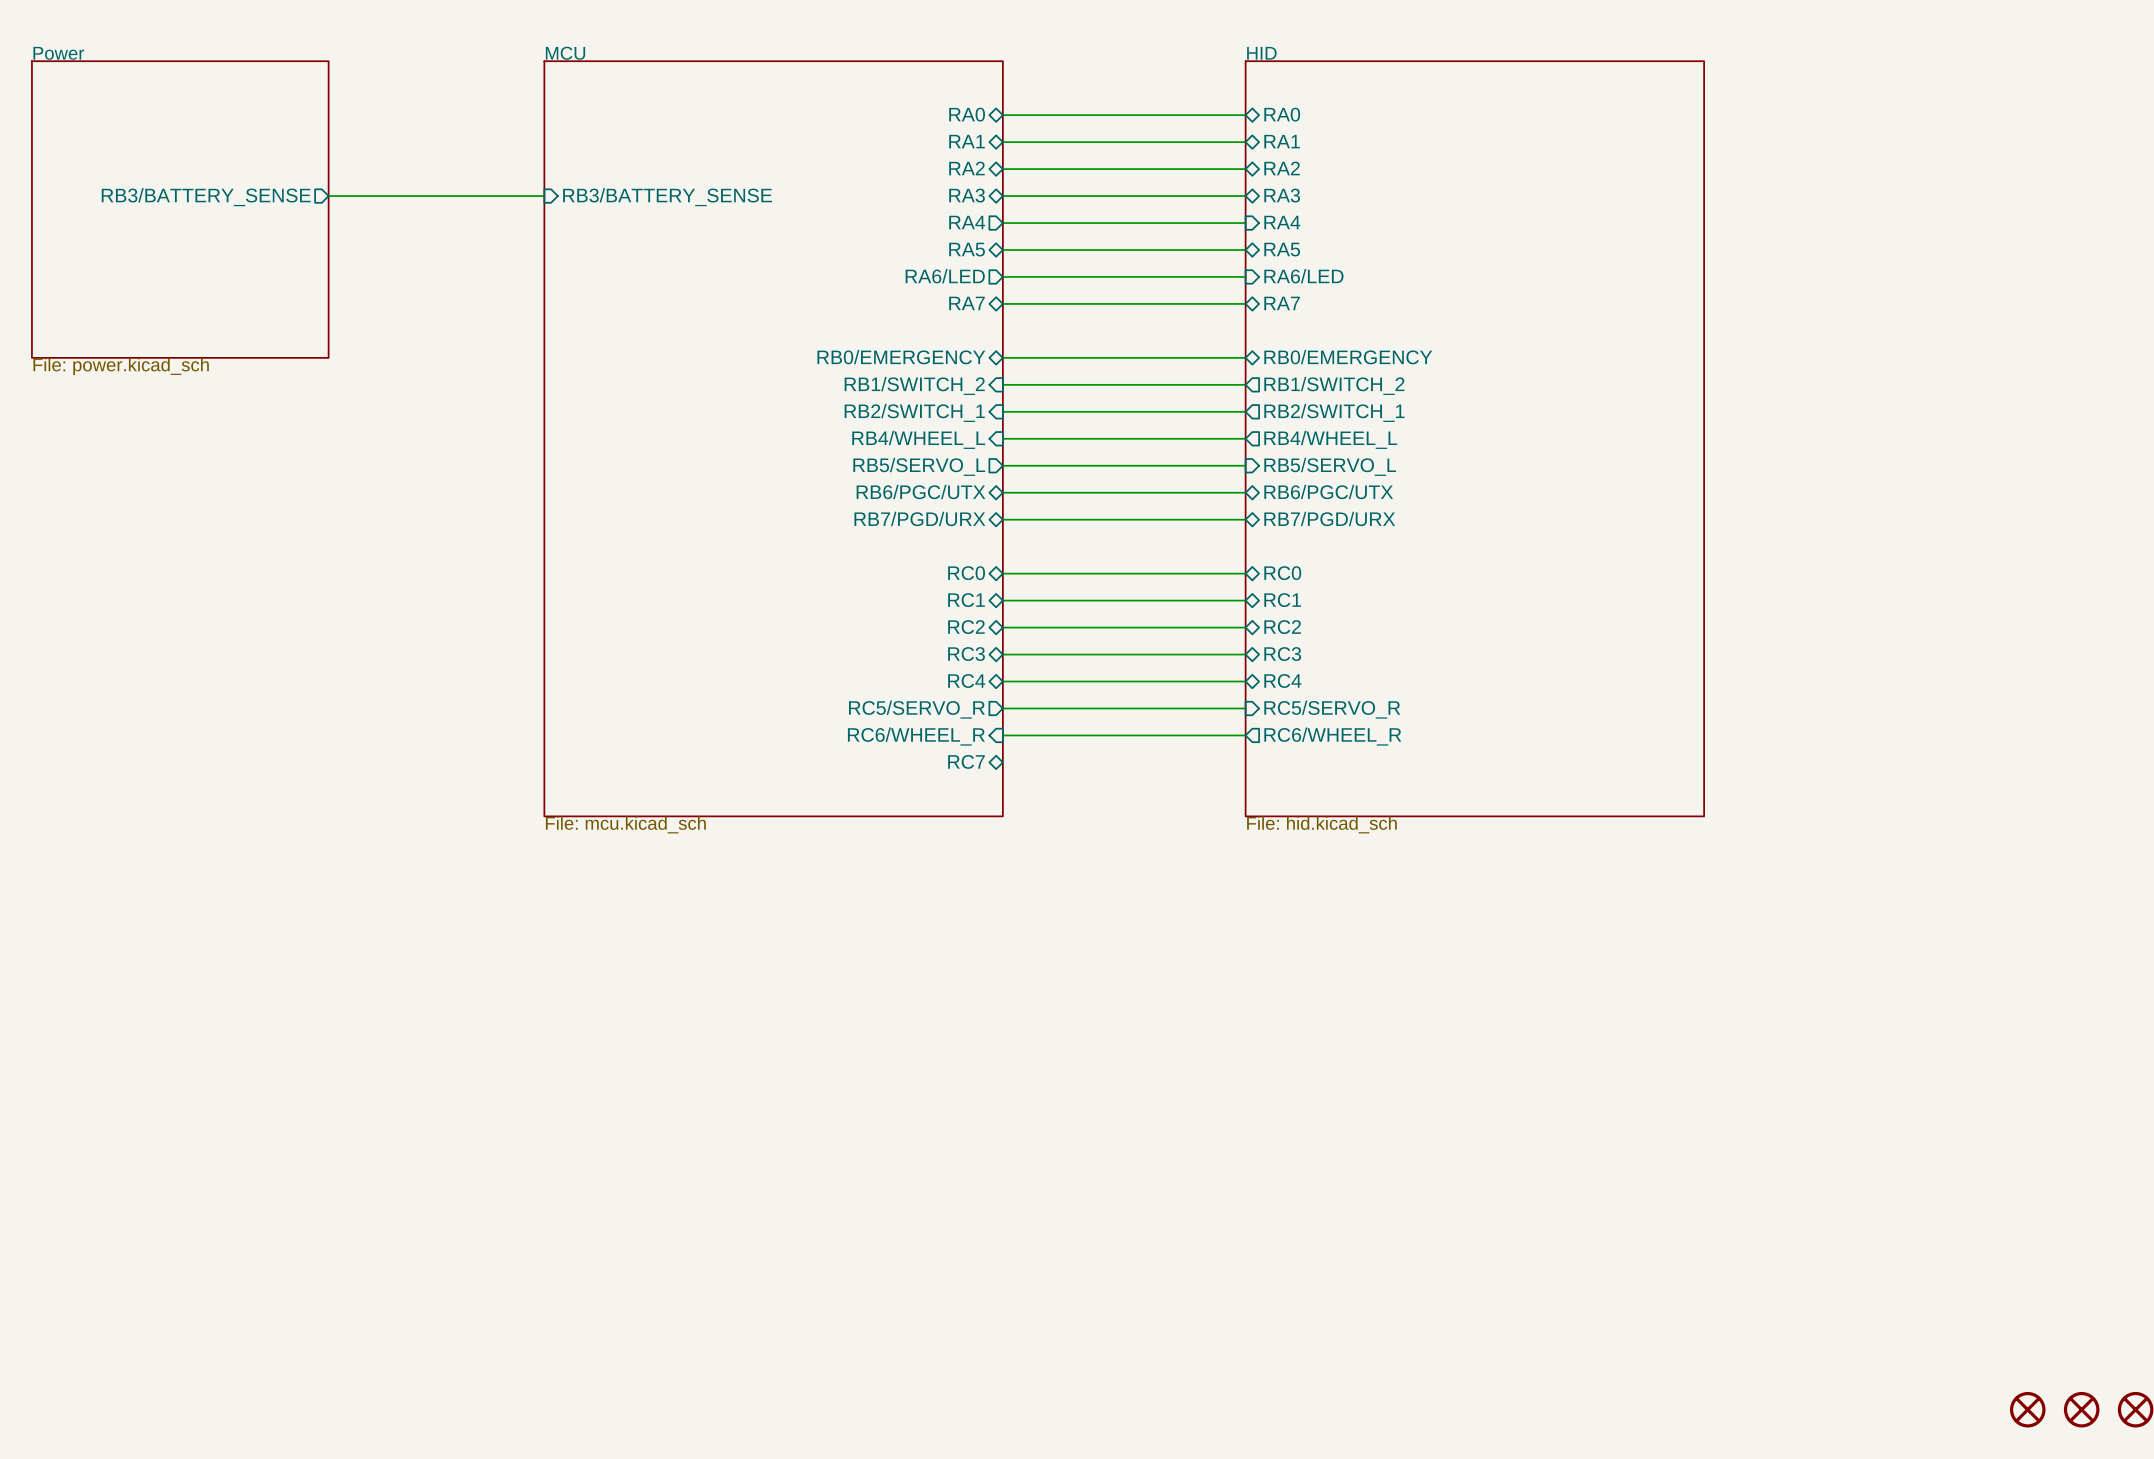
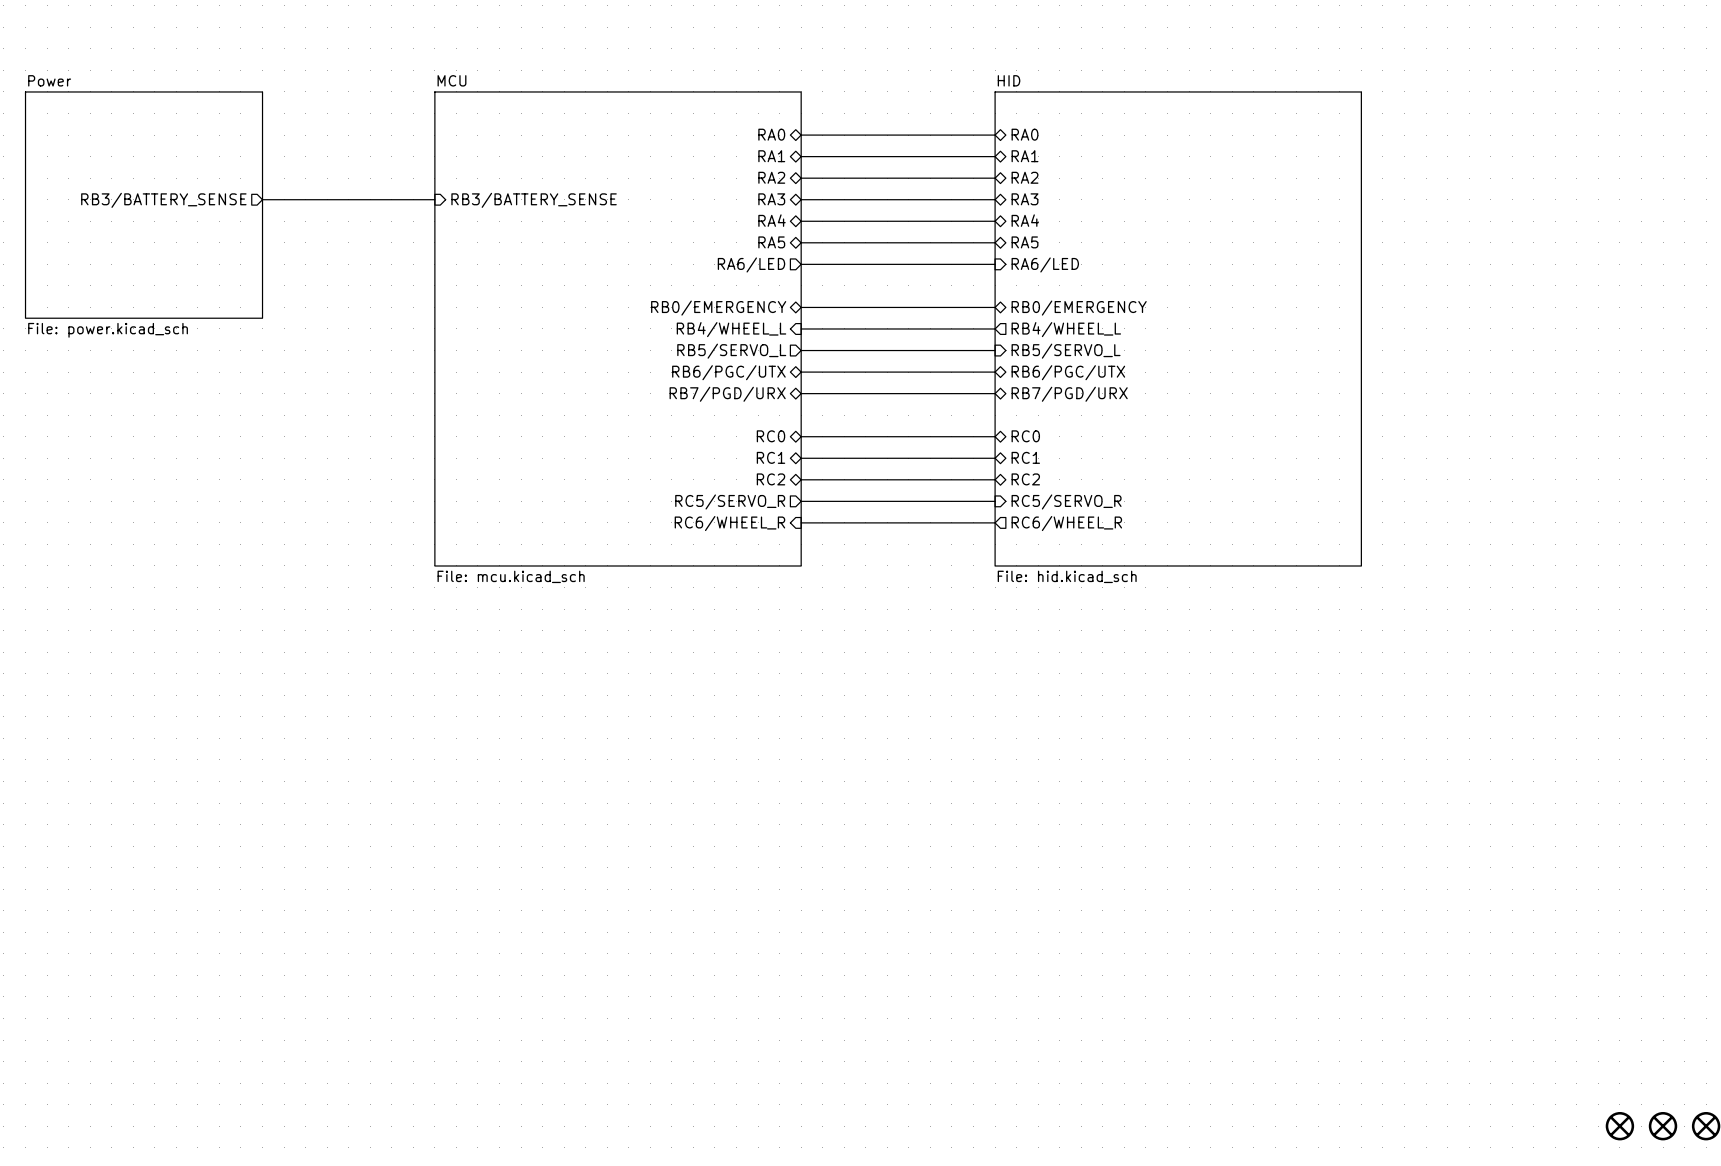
sheet pin: RA0 (967, 114) -> none
sheet pin: RA0 (1282, 114) -> none
wire: (1002, 115) (1245, 115) -> none
sheet pin: RA1 (967, 141) -> none
sheet pin: RA1 (1282, 141) -> none
wire: (1002, 142) (1245, 142) -> (801, 264) (995, 264)
sheet pin: RA2 (966, 168) -> RA0 (771, 134)
sheet pin: RA2 (1282, 168) -> RA0 (1025, 134)
sheet pin: RA3 (967, 195) -> RA1 (771, 156)
sheet pin: RA3 (1282, 195) -> RA1 (1025, 156)
wire: (328, 196) (544, 196) -> (262, 199) (434, 199)
sheet pin position: RB3/BATTERY_SENSE (206, 197) -> RB3/BATTERY_SENSE (163, 200)
sheet pin position: RB3/BATTERY_SENSE (667, 197) -> RB3/BATTERY_SENSE (534, 200)
sheet Power: File: power.kicad_sch (180, 209) -> none
sheet pin shape: output (967, 222) -> bidirectional (771, 177)
sheet pin: RA4 (967, 222) -> RA2 (771, 177)
sheet pin shape: input (1282, 222) -> bidirectional (1025, 177)
sheet pin: RA4 (1282, 222) -> RA2 (1025, 177)
sheet pin: RA5 (967, 249) -> RA3 (771, 199)
sheet pin: RA5 (1282, 249) -> RA3 (1025, 199)
sheet Power: none -> File: power.kicad_sch (144, 205)
sheet pin shape: output (945, 276) -> bidirectional (772, 220)
sheet pin: RA6/LED (945, 276) -> RA4 (772, 220)
sheet pin shape: input (1303, 276) -> bidirectional (1025, 220)
sheet pin: RA6/LED (1303, 276) -> RA4 (1025, 220)
sheet pin: RA7 (966, 303) -> RA5 (771, 242)
sheet pin: RA7 (1282, 303) -> RA5 (1025, 242)
sheet pin: none -> RA6/LED (751, 264)
sheet pin: none -> RA6/LED (1045, 264)
sheet pin: RB0/EMERGENCY (901, 357) -> none
wire: (1002, 357) (1245, 357) -> (801, 436) (995, 436)
sheet pin: RB0/EMERGENCY (1348, 357) -> none
sheet pin shape: input (914, 385) -> bidirectional (718, 308)
sheet pin: RB1/SWITCH_2 (914, 385) -> RB0/EMERGENCY (718, 308)
sheet pin shape: output (1334, 385) -> bidirectional (1079, 308)
sheet pin: RB1/SWITCH_2 (1334, 385) -> RB0/EMERGENCY (1079, 308)
sheet MCU: none -> File: mcu.kicad_sch (618, 328)
sheet HID: none -> File: hid.kicad_sch (1178, 328)
sheet pin: RB2/SWITCH_1 (914, 412) -> RB4/WHEEL_L (731, 329)
sheet pin: RB2/SWITCH_1 (1334, 412) -> RB4/WHEEL_L (1066, 329)
sheet MCU: File: mcu.kicad_sch (773, 438) -> none
sheet HID: File: hid.kicad_sch (1474, 438) -> none
sheet pin shape: input (918, 439) -> output (731, 351)
sheet pin: RB4/WHEEL_L (918, 439) -> RB5/SERVO_L (731, 351)
sheet pin shape: output (1330, 439) -> input (1066, 351)
sheet pin: RB4/WHEEL_L (1330, 439) -> RB5/SERVO_L (1066, 351)
sheet pin shape: output (919, 466) -> bidirectional (728, 372)
sheet pin: RB5/SERVO_L (919, 466) -> RB6/PGC/UTX (728, 372)
sheet pin shape: input (1330, 466) -> bidirectional (1068, 372)
sheet pin: RB5/SERVO_L (1330, 466) -> RB6/PGC/UTX (1068, 372)
sheet pin: RB6/PGC/UTX (920, 491) -> RB7/PGD/URX (727, 394)
sheet pin: RB6/PGC/UTX (1328, 491) -> RB7/PGD/URX (1069, 394)
sheet pin: RB7/PGD/URX (919, 518) -> none
sheet pin: RB7/PGD/URX (1329, 518) -> none
wire: (1002, 519) (1245, 519) -> none
sheet pin: none -> RC0 (770, 436)
sheet pin: none -> RC0 (1025, 436)
sheet pin: RC0 (966, 573) -> RC1 (770, 457)
sheet pin: RC0 (1282, 573) -> RC1 (1025, 457)
sheet pin: RC1 (966, 600) -> RC2 (770, 479)
sheet pin: RC1 (1282, 600) -> RC2 (1025, 479)
sheet pin shape: bidirectional (966, 627) -> output (730, 501)
sheet pin: RC2 (966, 627) -> RC5/SERVO_R (730, 501)
sheet pin shape: bidirectional (1282, 627) -> input (1066, 501)
sheet pin: RC2 (1282, 627) -> RC5/SERVO_R (1066, 501)
sheet pin shape: bidirectional (966, 654) -> input (729, 523)
sheet pin: RC3 (966, 654) -> RC6/WHEEL_R (729, 523)
sheet pin shape: bidirectional (1282, 654) -> output (1066, 523)
sheet pin: RC3 (1282, 654) -> RC6/WHEEL_R (1066, 523)
sheet pin: RC4 (966, 681) -> none
wire: (1002, 681) (1245, 681) -> none
sheet pin: RC4 (1282, 681) -> none
wire: (1002, 708) (1245, 708) -> none
sheet pin: RC5/SERVO_R (916, 709) -> none
sheet pin: RC5/SERVO_R (1332, 709) -> none
wire: (1002, 735) (1245, 735) -> none
sheet pin: RC6/WHEEL_R (916, 736) -> none
sheet pin: RC6/WHEEL_R (1332, 736) -> none
sheet pin: RC7 (966, 761) -> none

